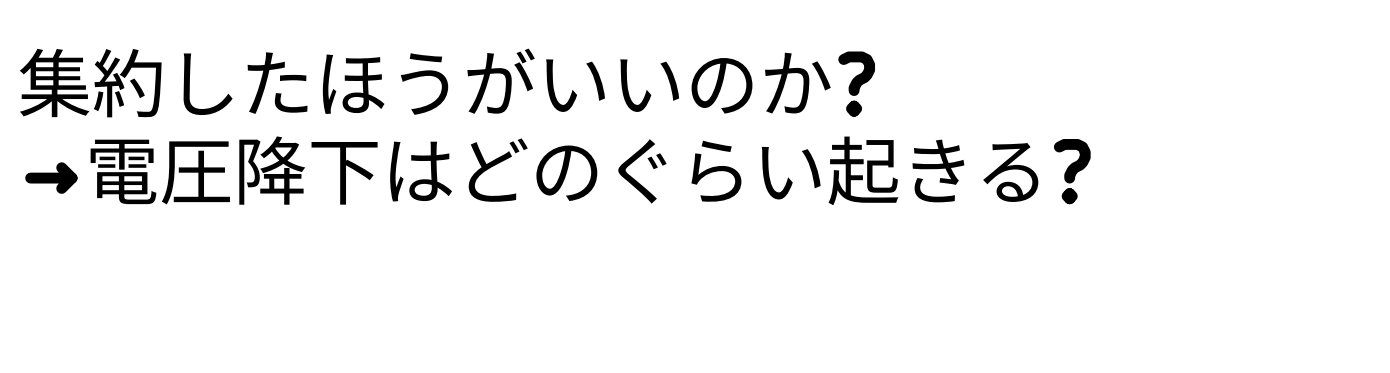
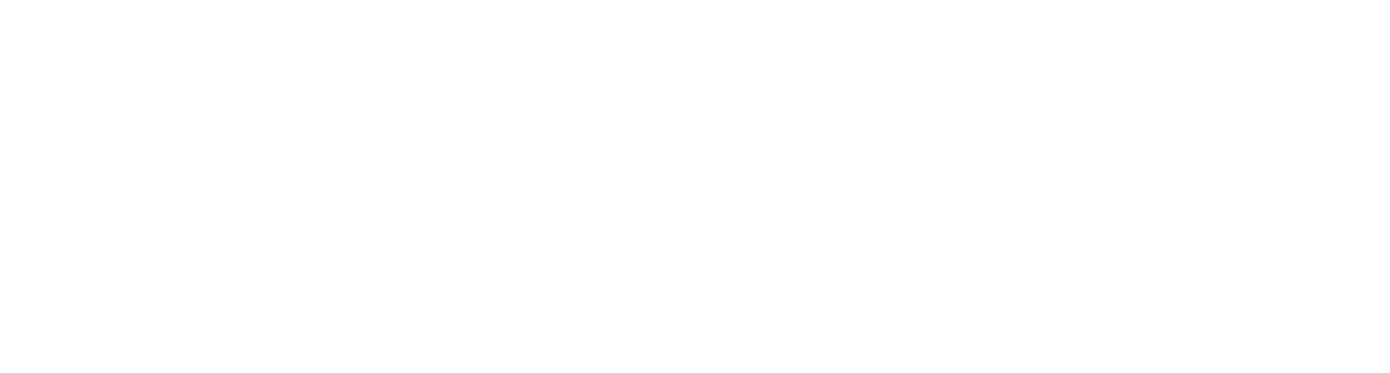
text: 集約したほうがいいのか? (444, 82) -> none
text: →電圧降下はどのぐらい起きる? (557, 170) -> none

